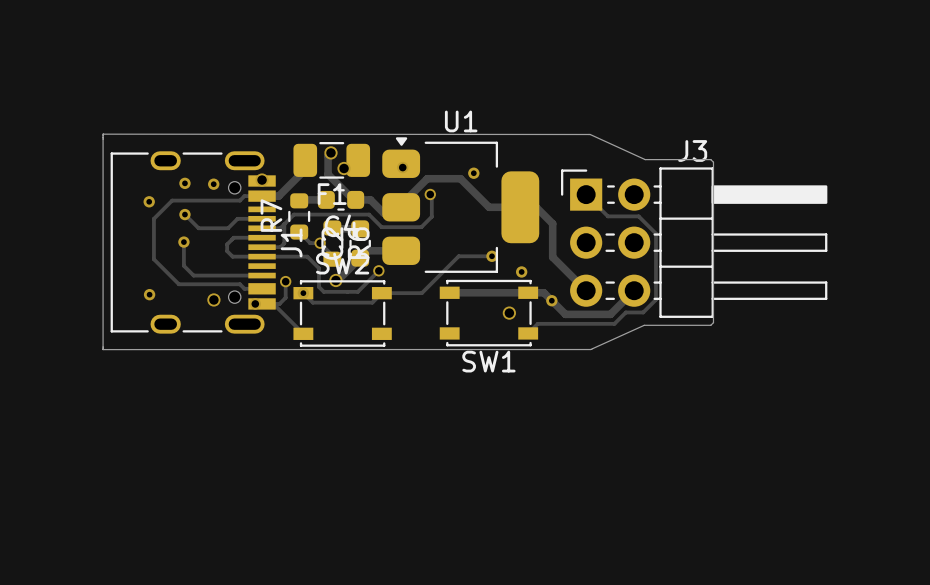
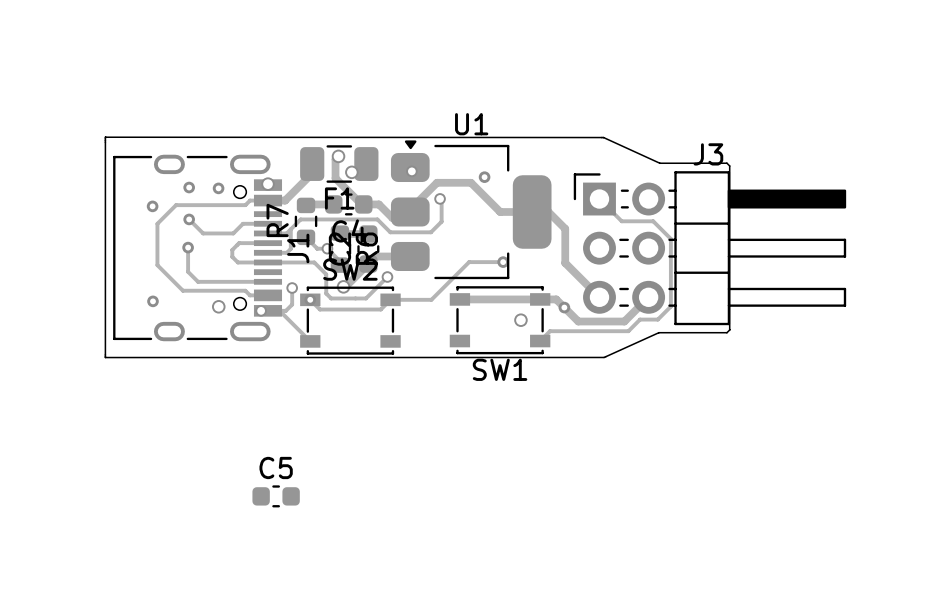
via: (521, 271) -> none
C5: none -> (276, 496)

